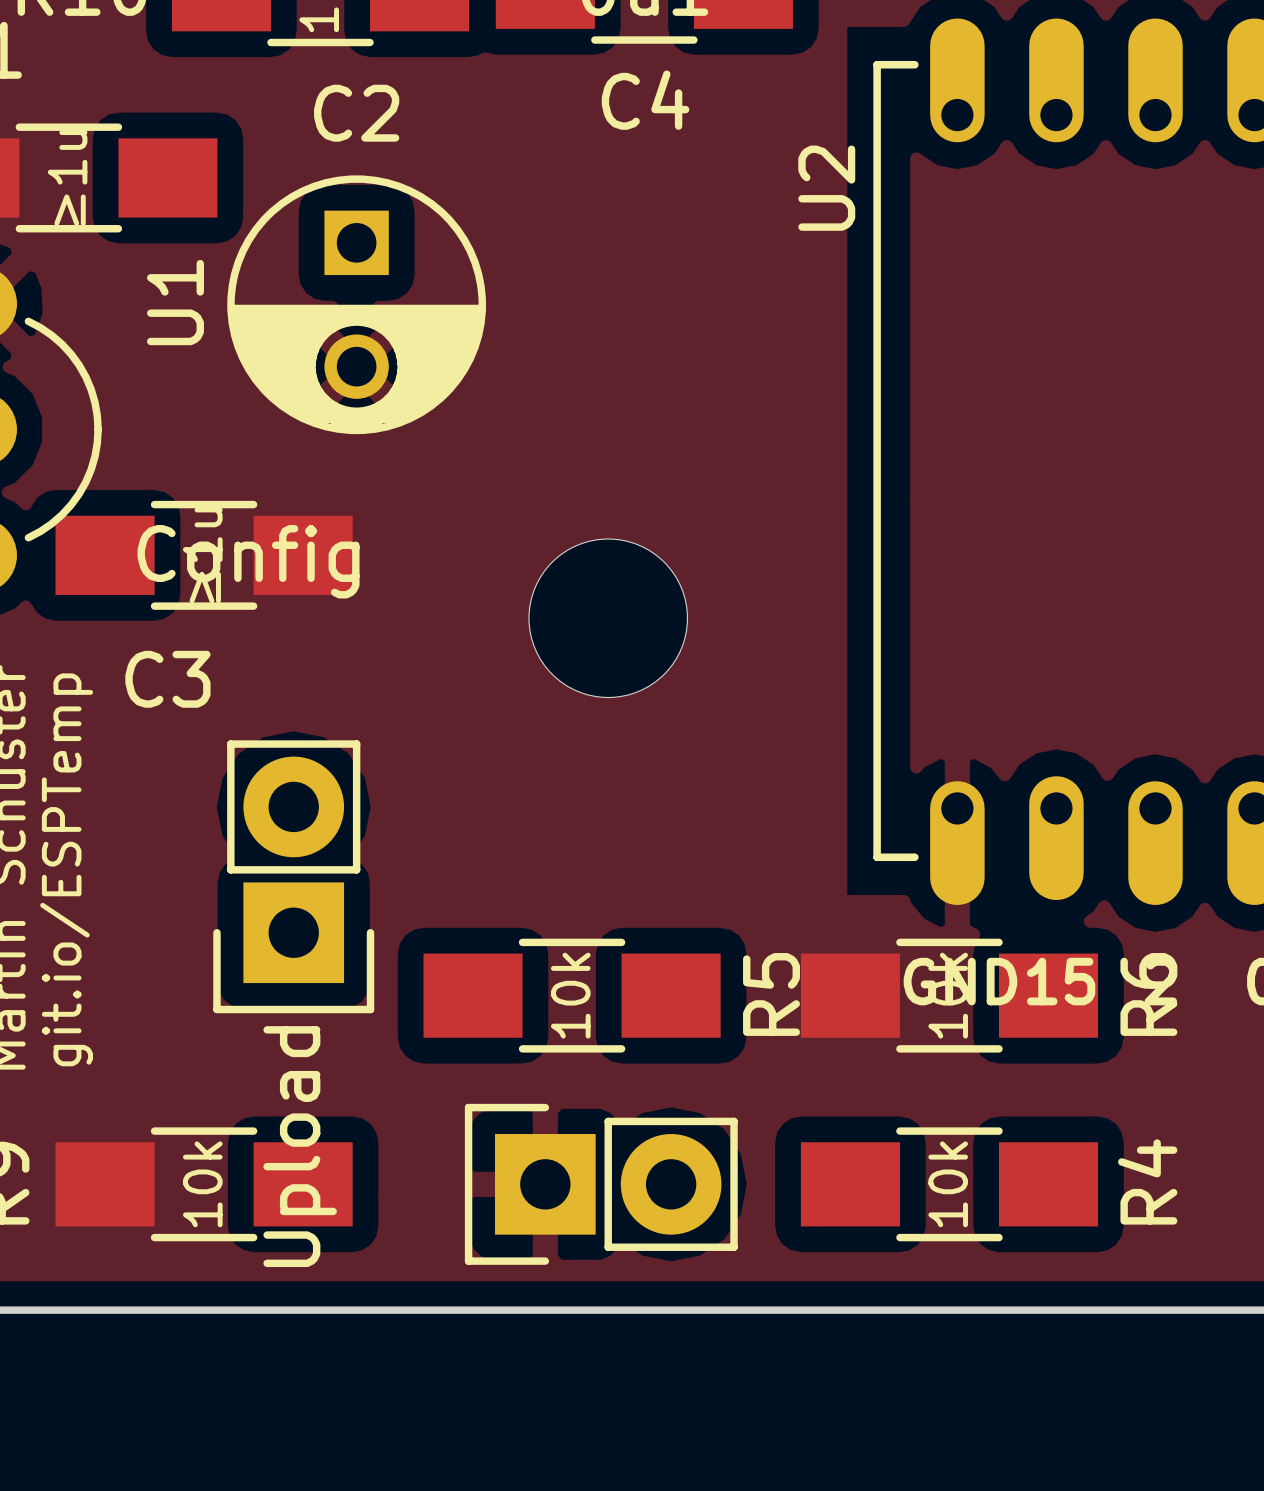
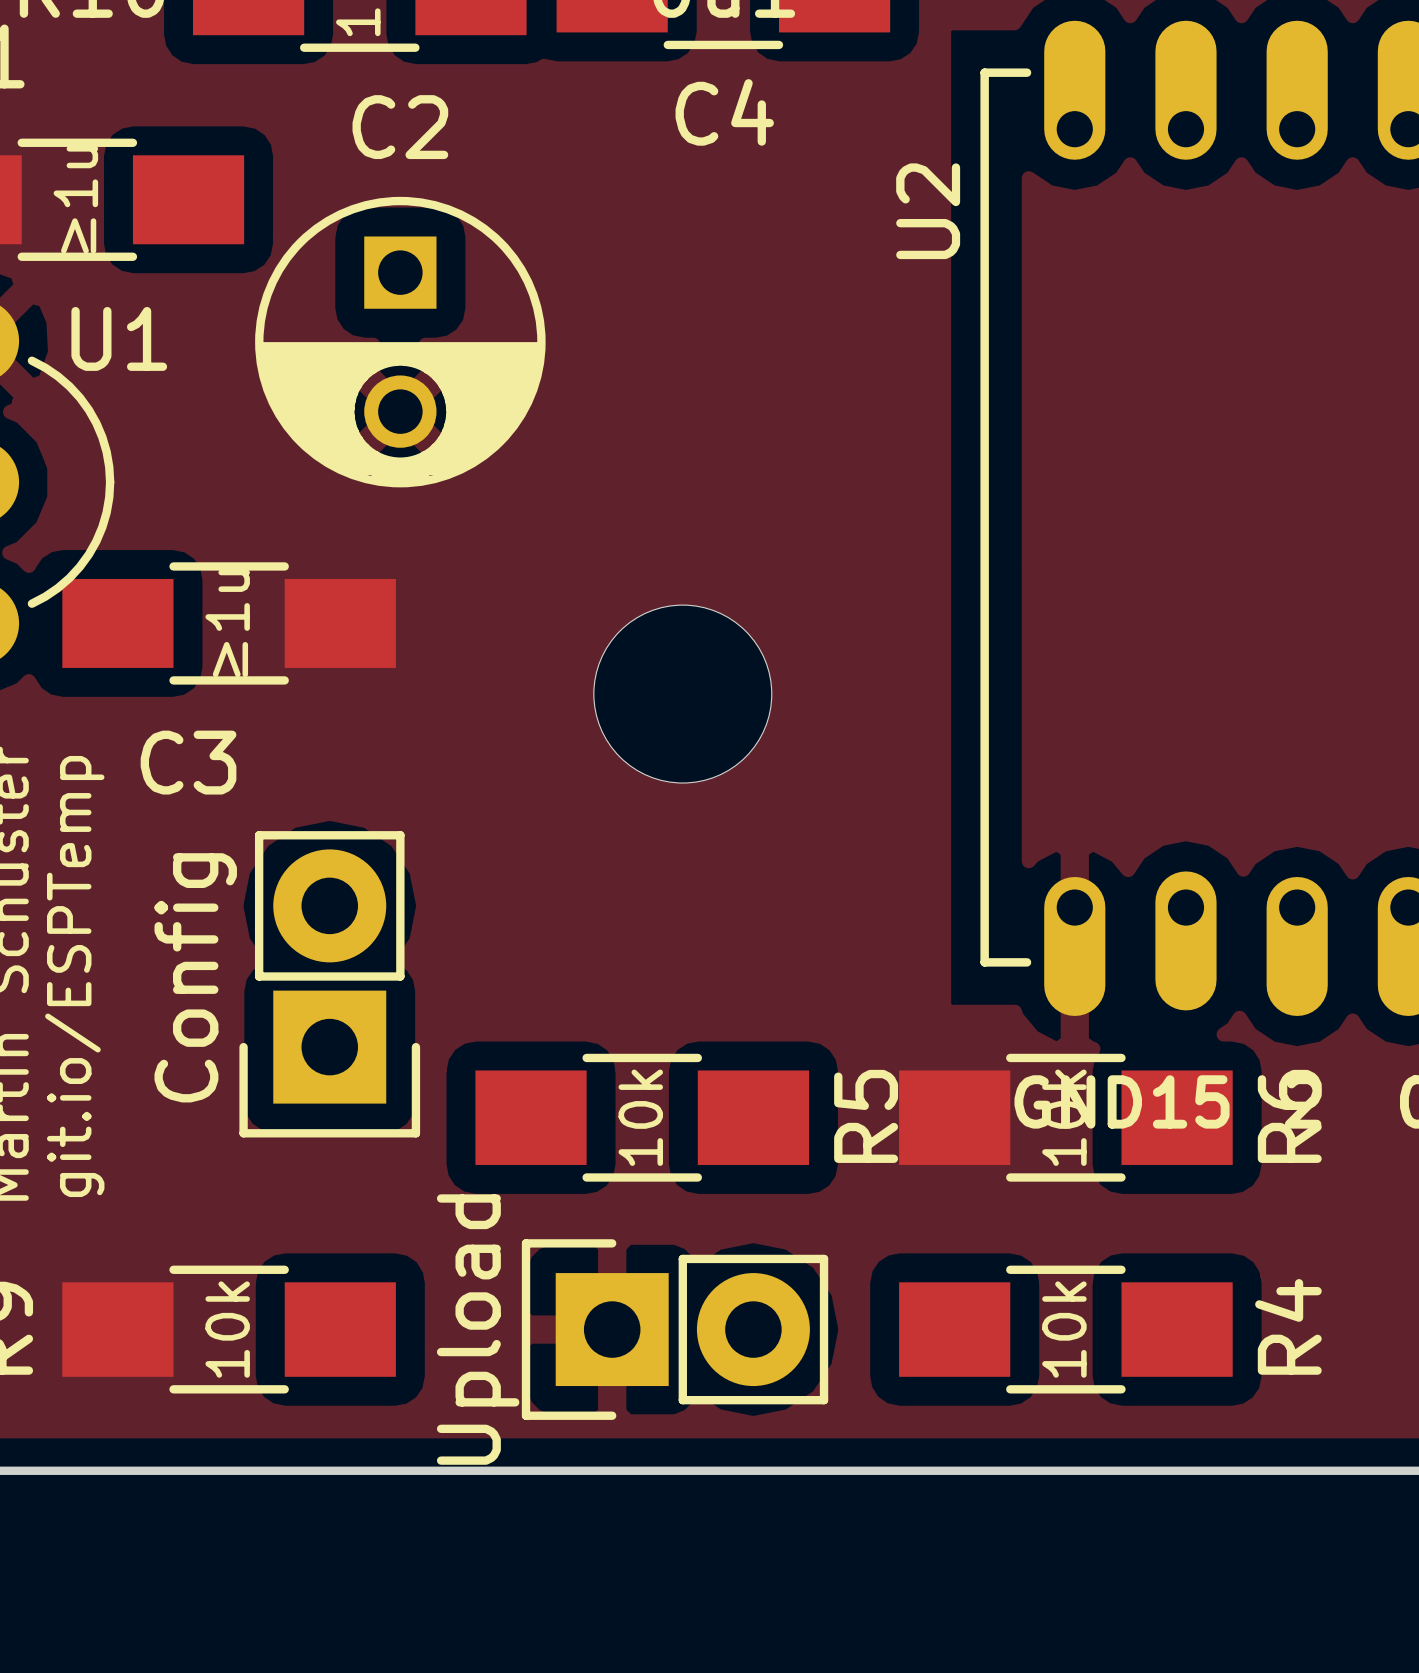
U1 name rotation: 0° (175, 302) -> 90° clockwise (119, 338)
part value rotation: 0° (248, 561) -> 90° counterclockwise (195, 977)
part value position: Config (248, 561) -> Config (195, 977)
part value position: Upload (300, 1146) -> Upload (478, 1329)

